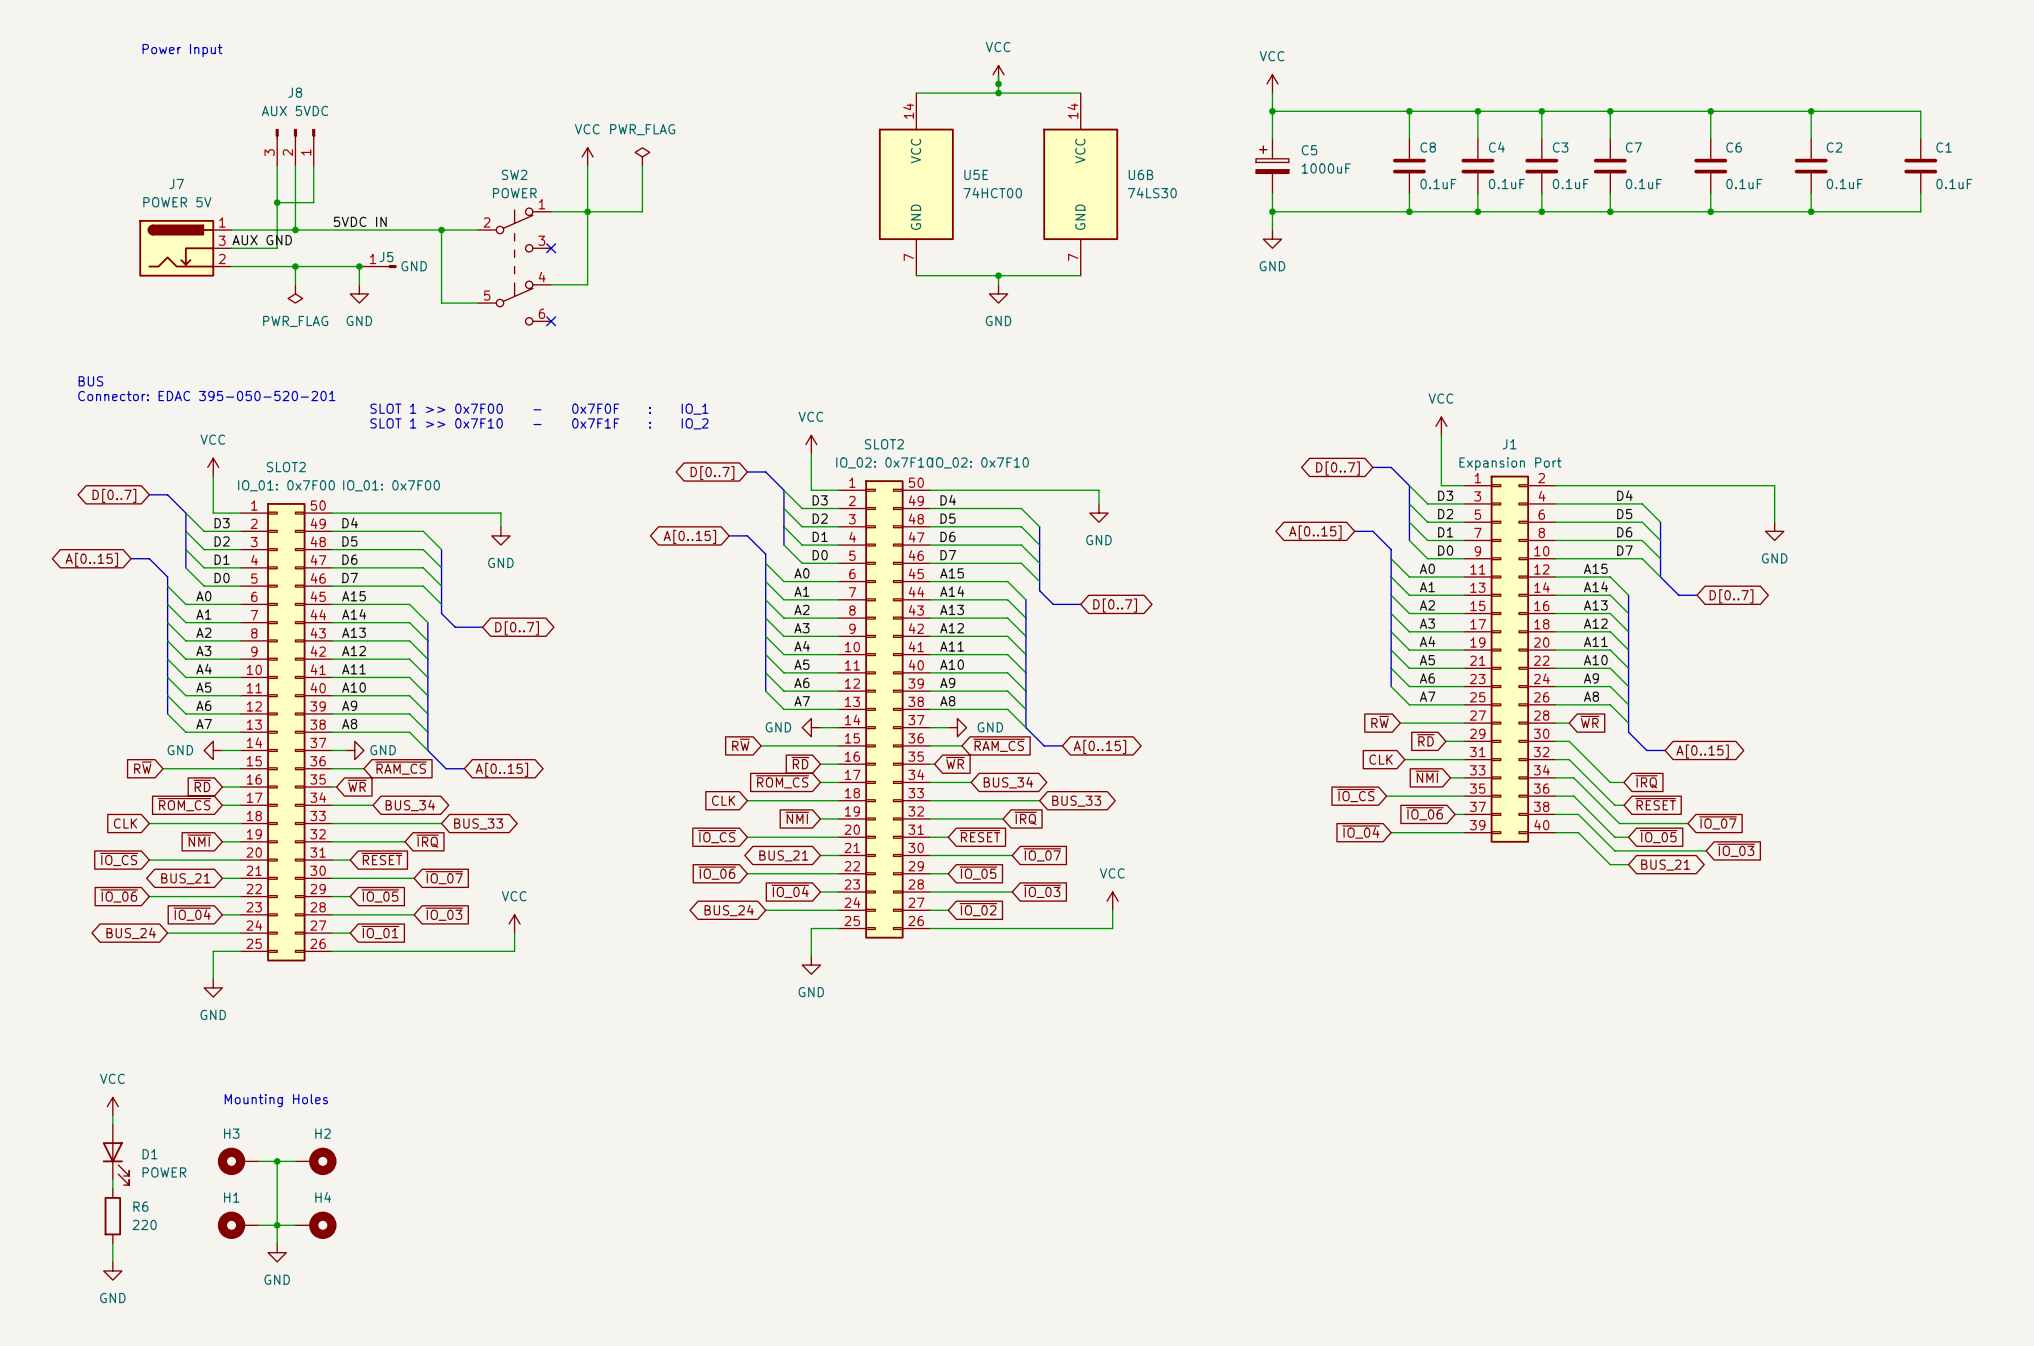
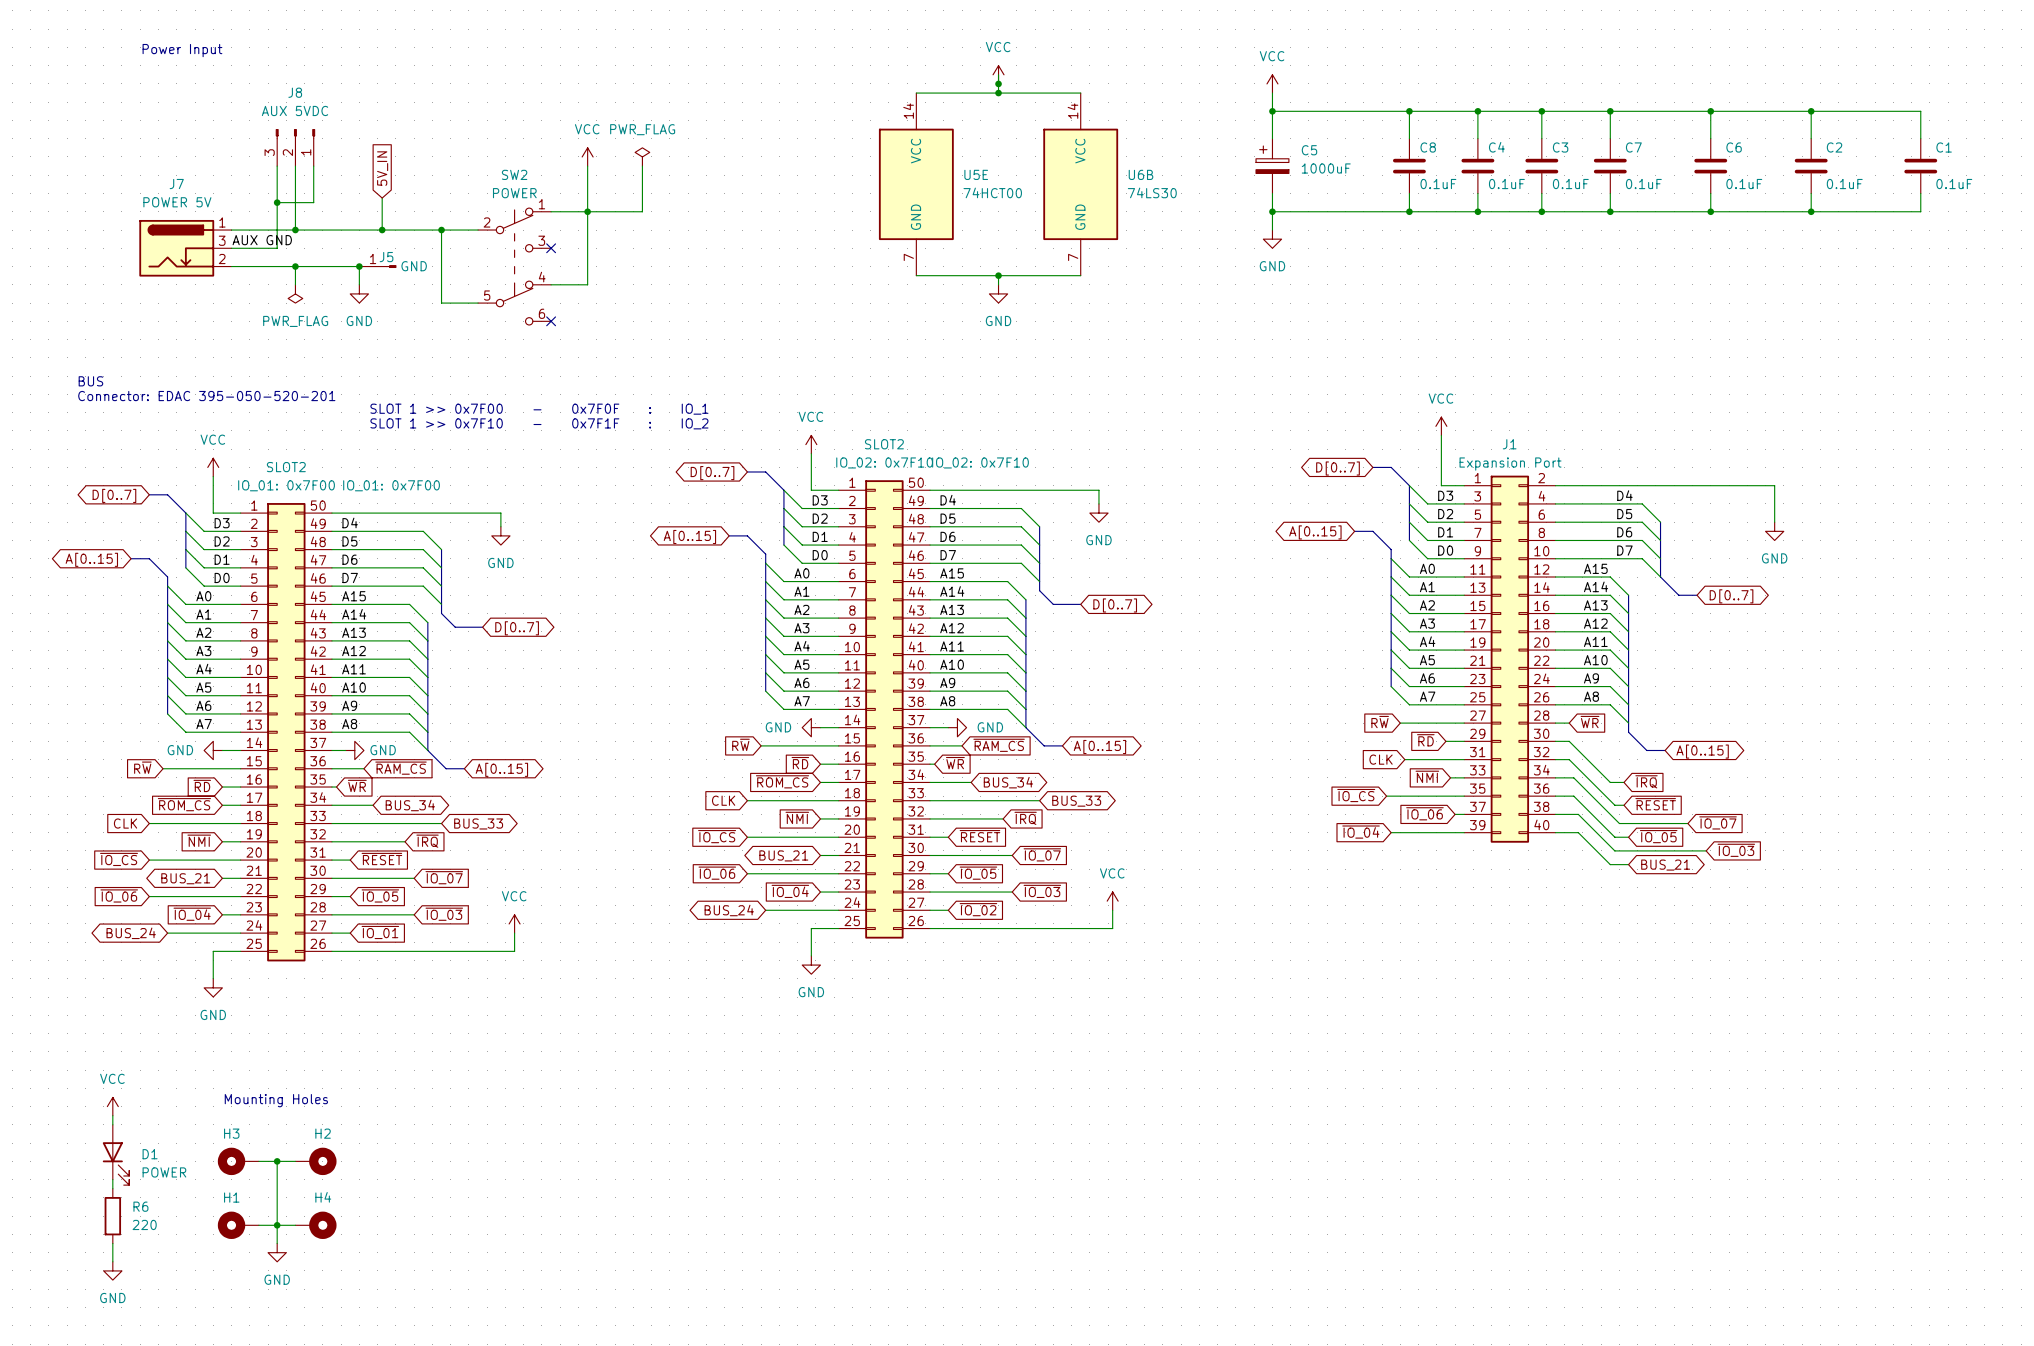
global label: none -> 5V_IN (382, 168)
wire: none -> (382, 198) (382, 230)
label: 5VDC IN (360, 221) -> none
junction: none -> (382, 230)

